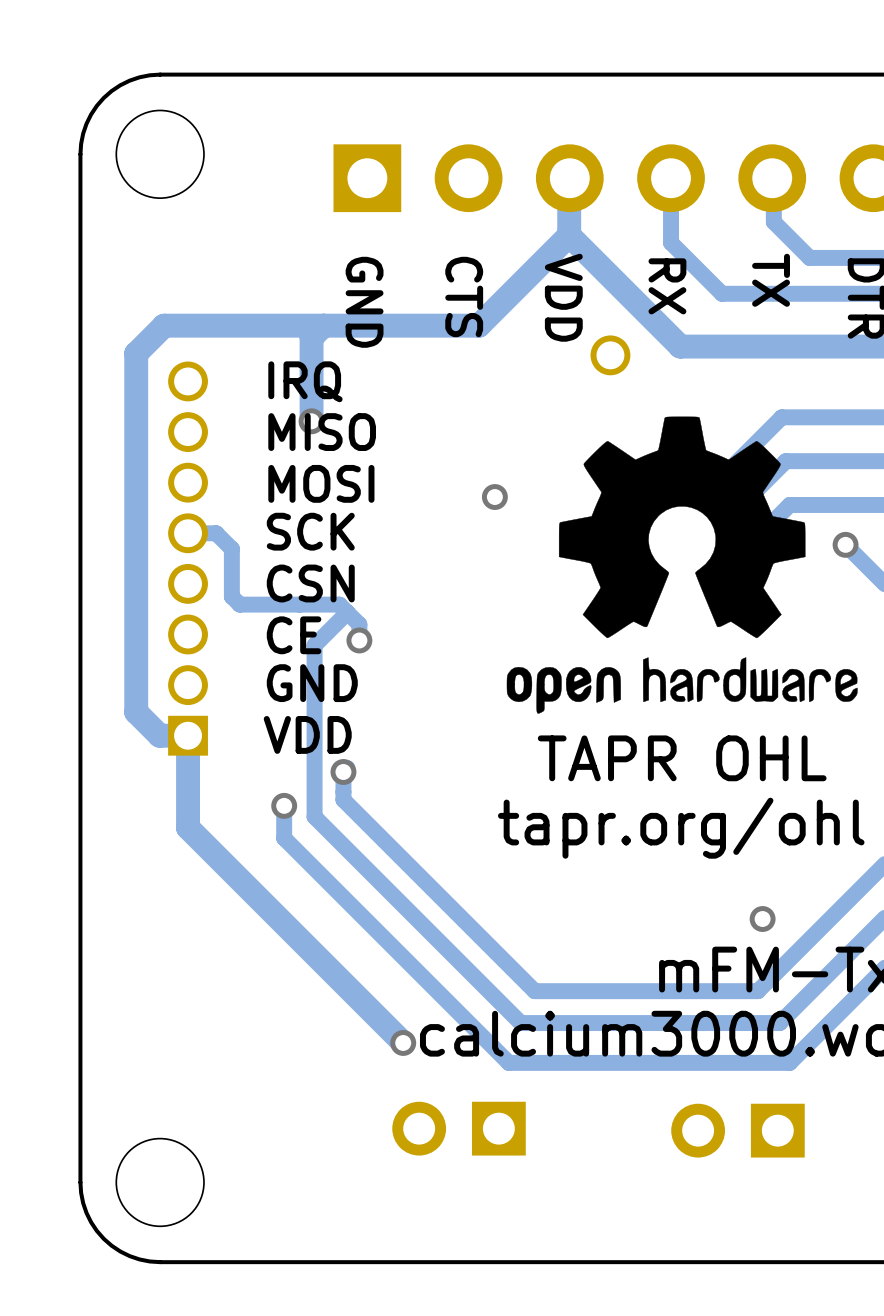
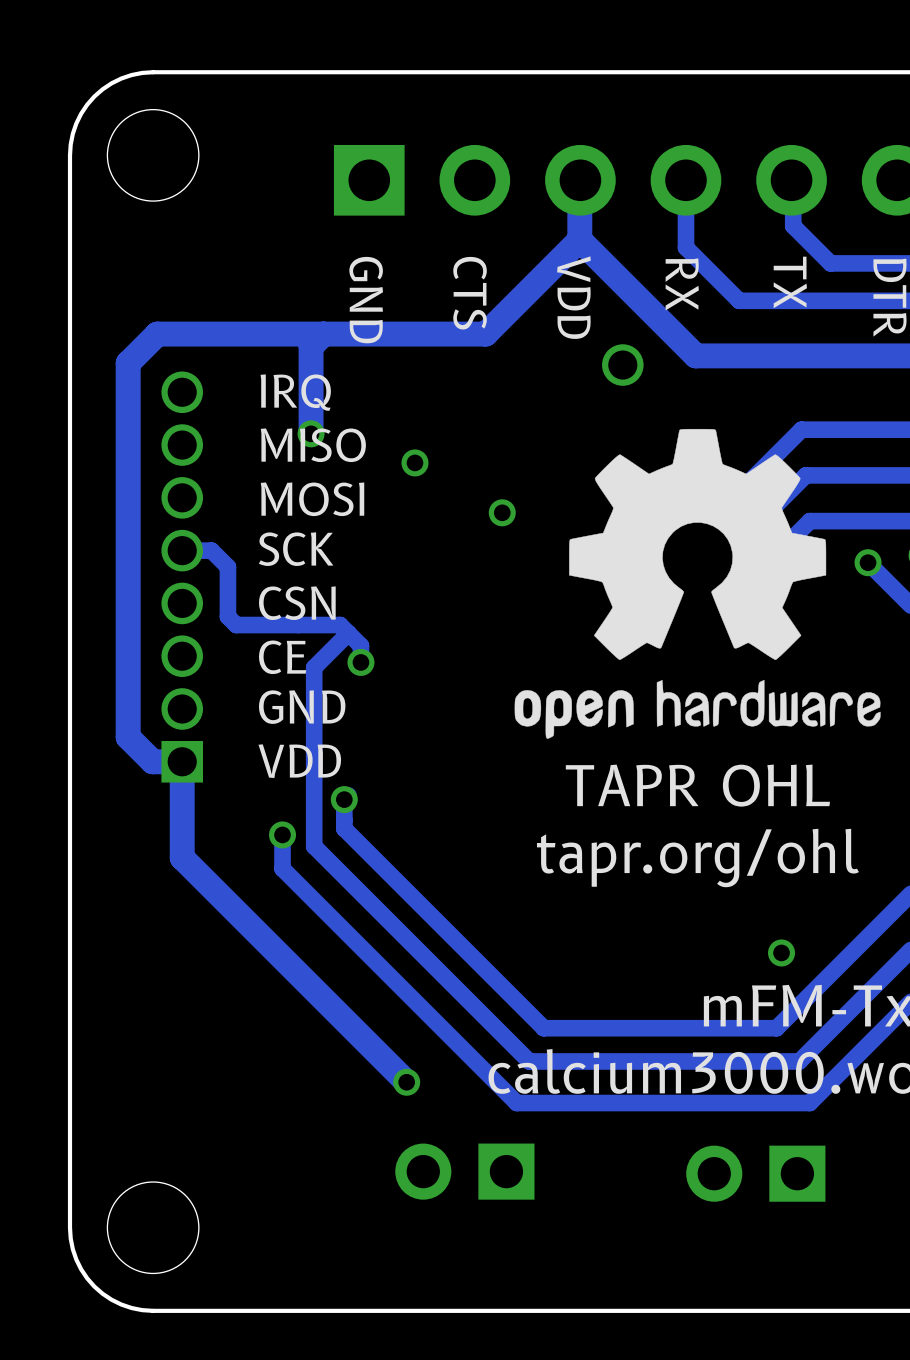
via: none -> (414, 462)

